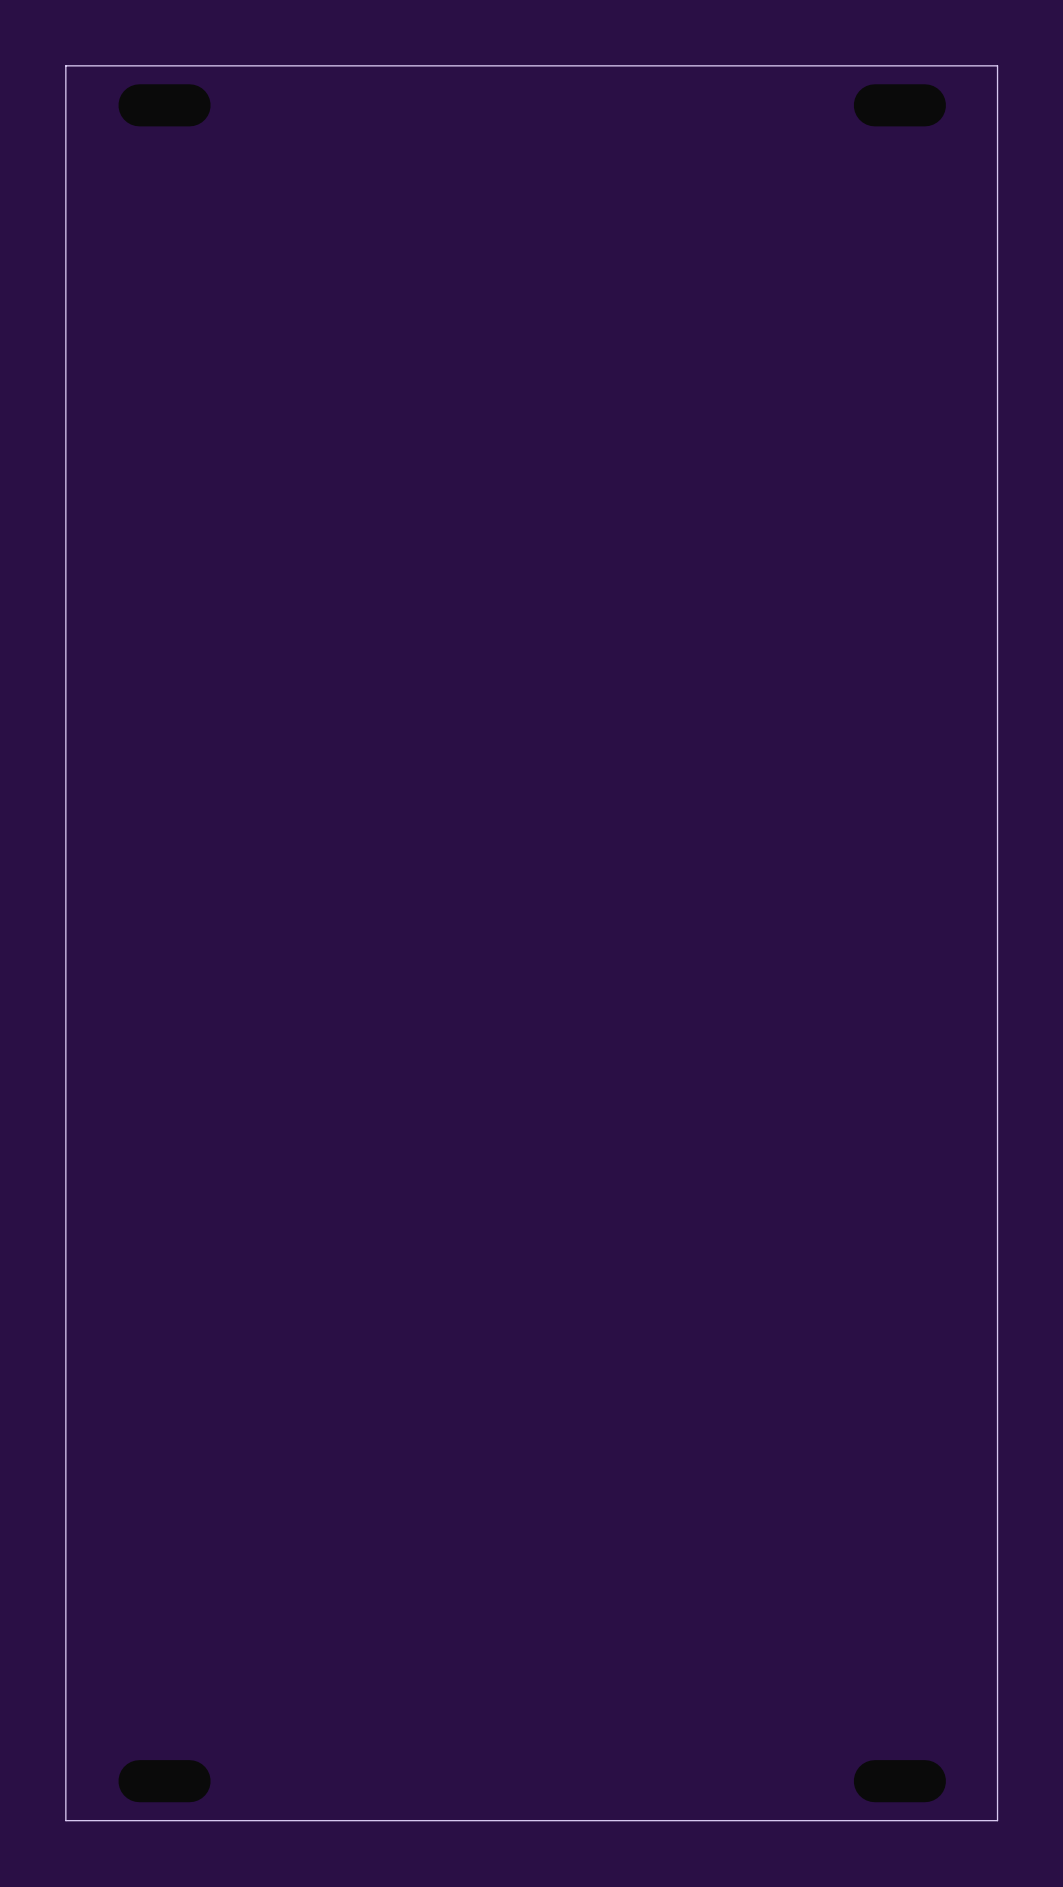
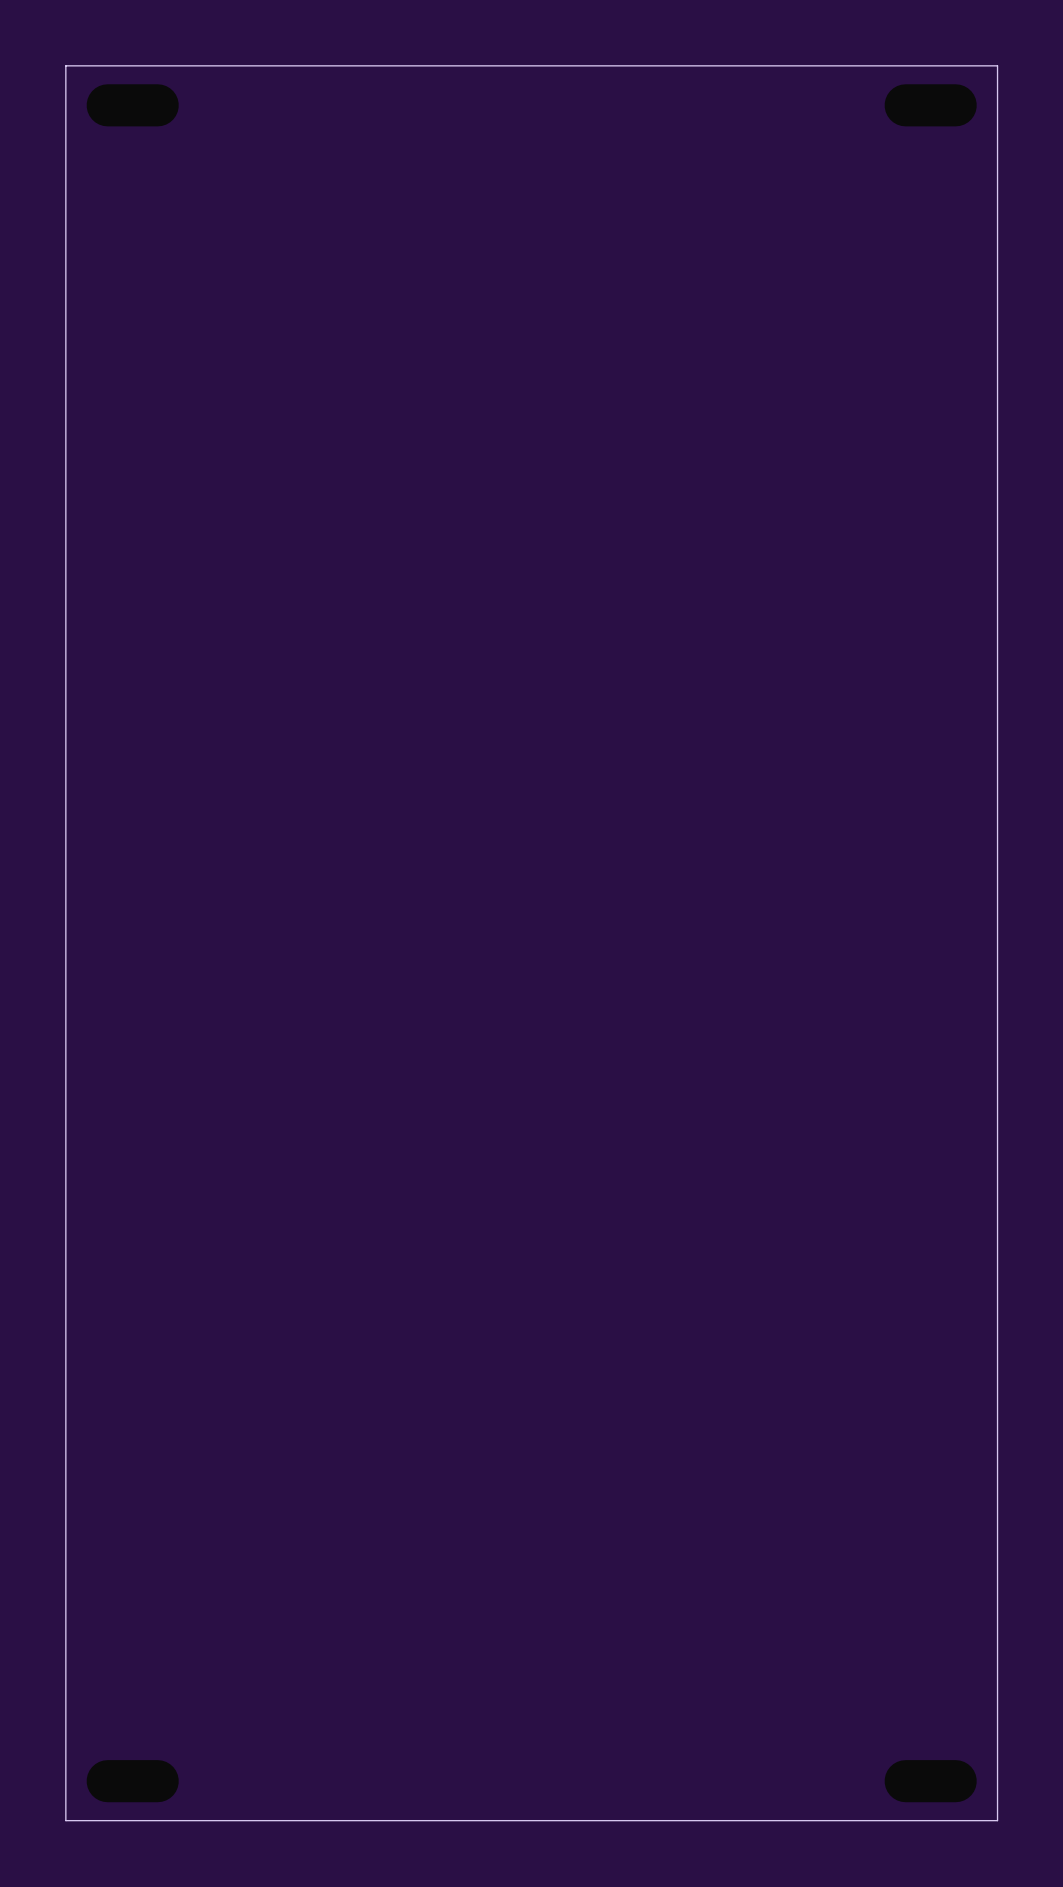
part position: (164, 105) -> (132, 105)
part position: (899, 105) -> (930, 105)
part position: (164, 1781) -> (132, 1781)
part position: (899, 1781) -> (930, 1781)

